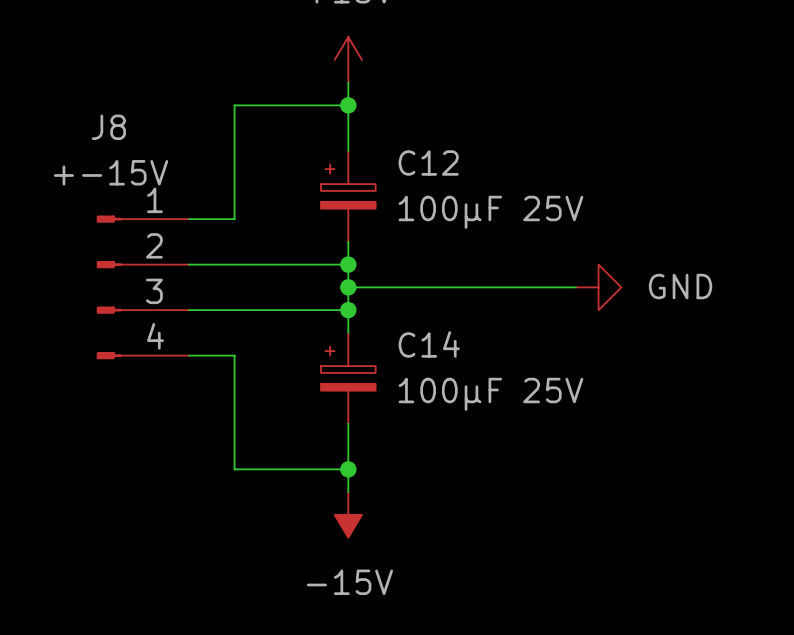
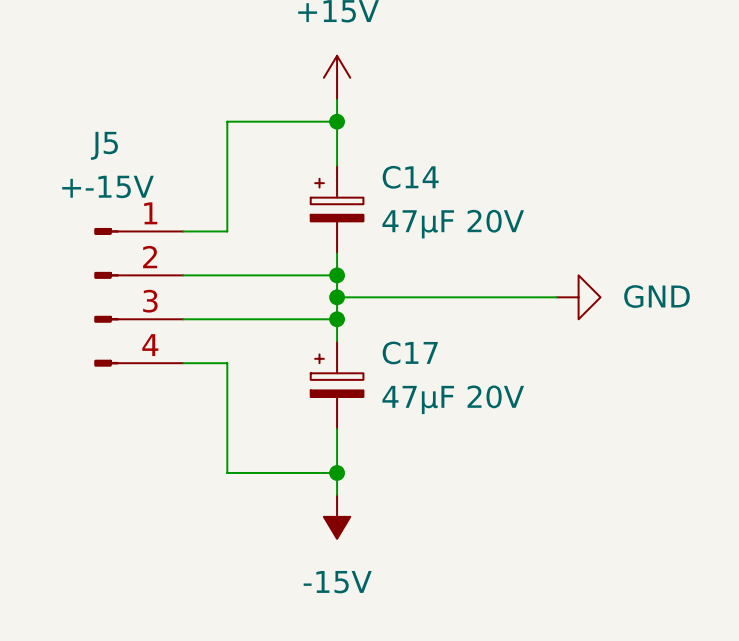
J8 name: J8 (108, 127) -> J5 (104, 145)
C12 name: C12 (428, 162) -> C14 (410, 177)
C12 value: 100µF 25V (490, 212) -> 47µF 20V (453, 224)
C14 name: C14 (429, 344) -> C17 (410, 352)
C14 value: 100µF 25V (490, 394) -> 47µF 20V (453, 399)

